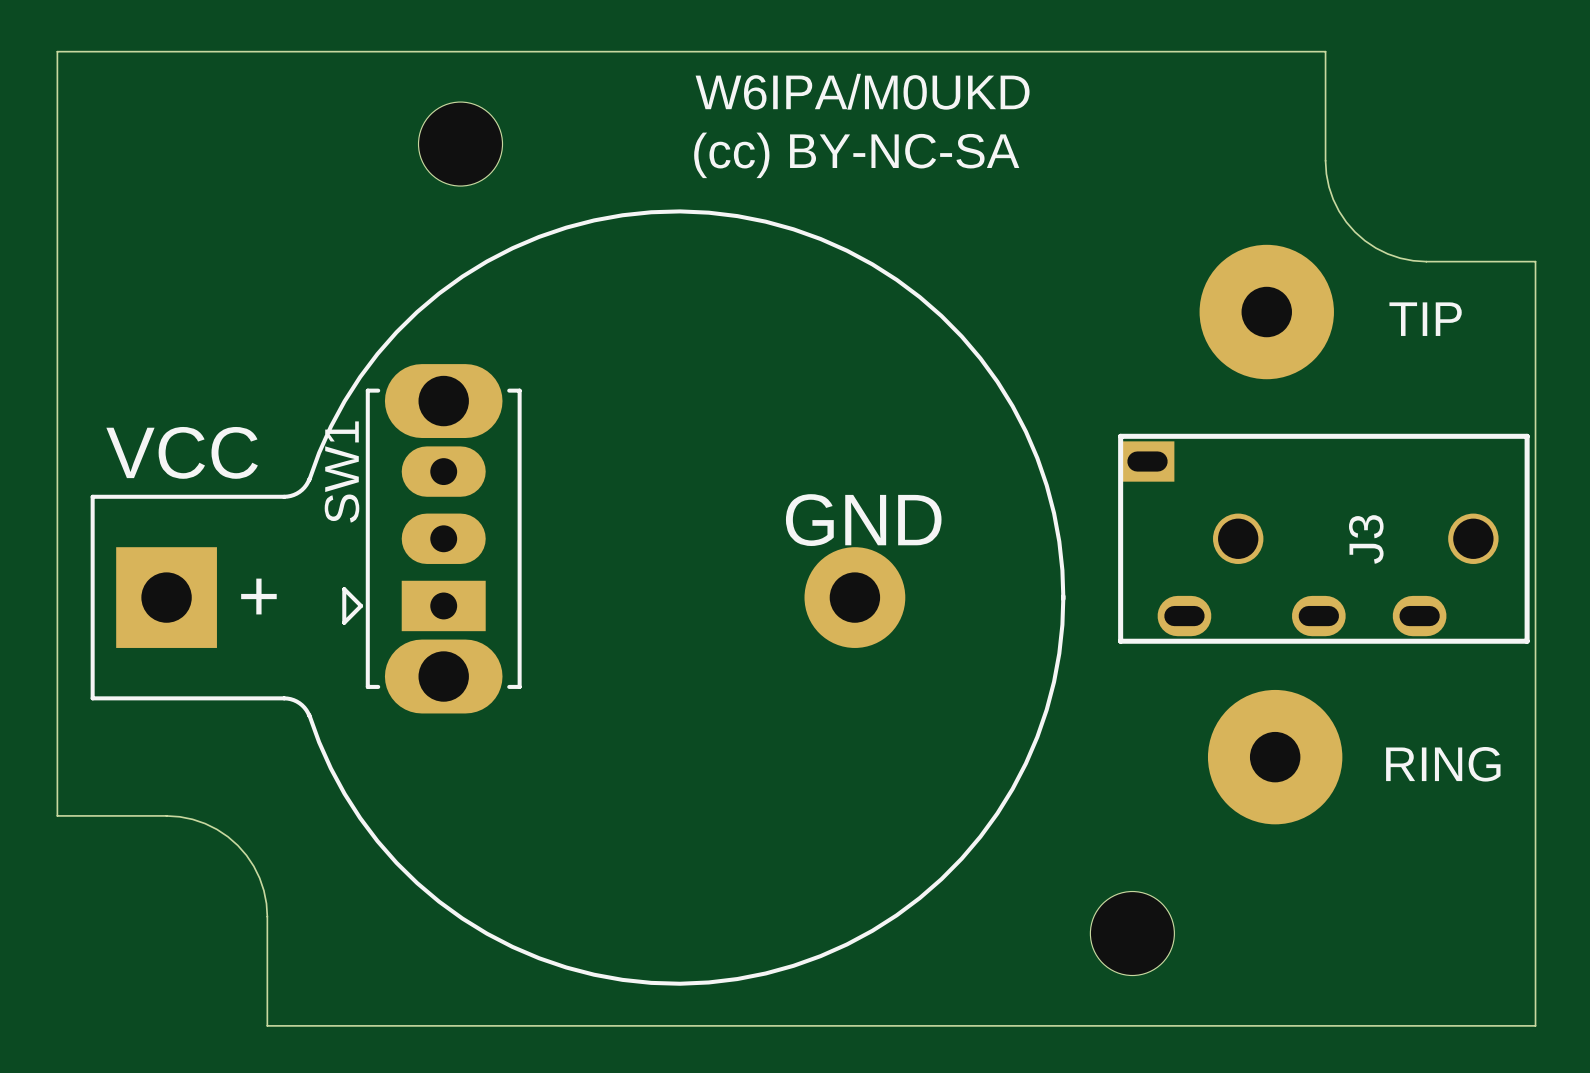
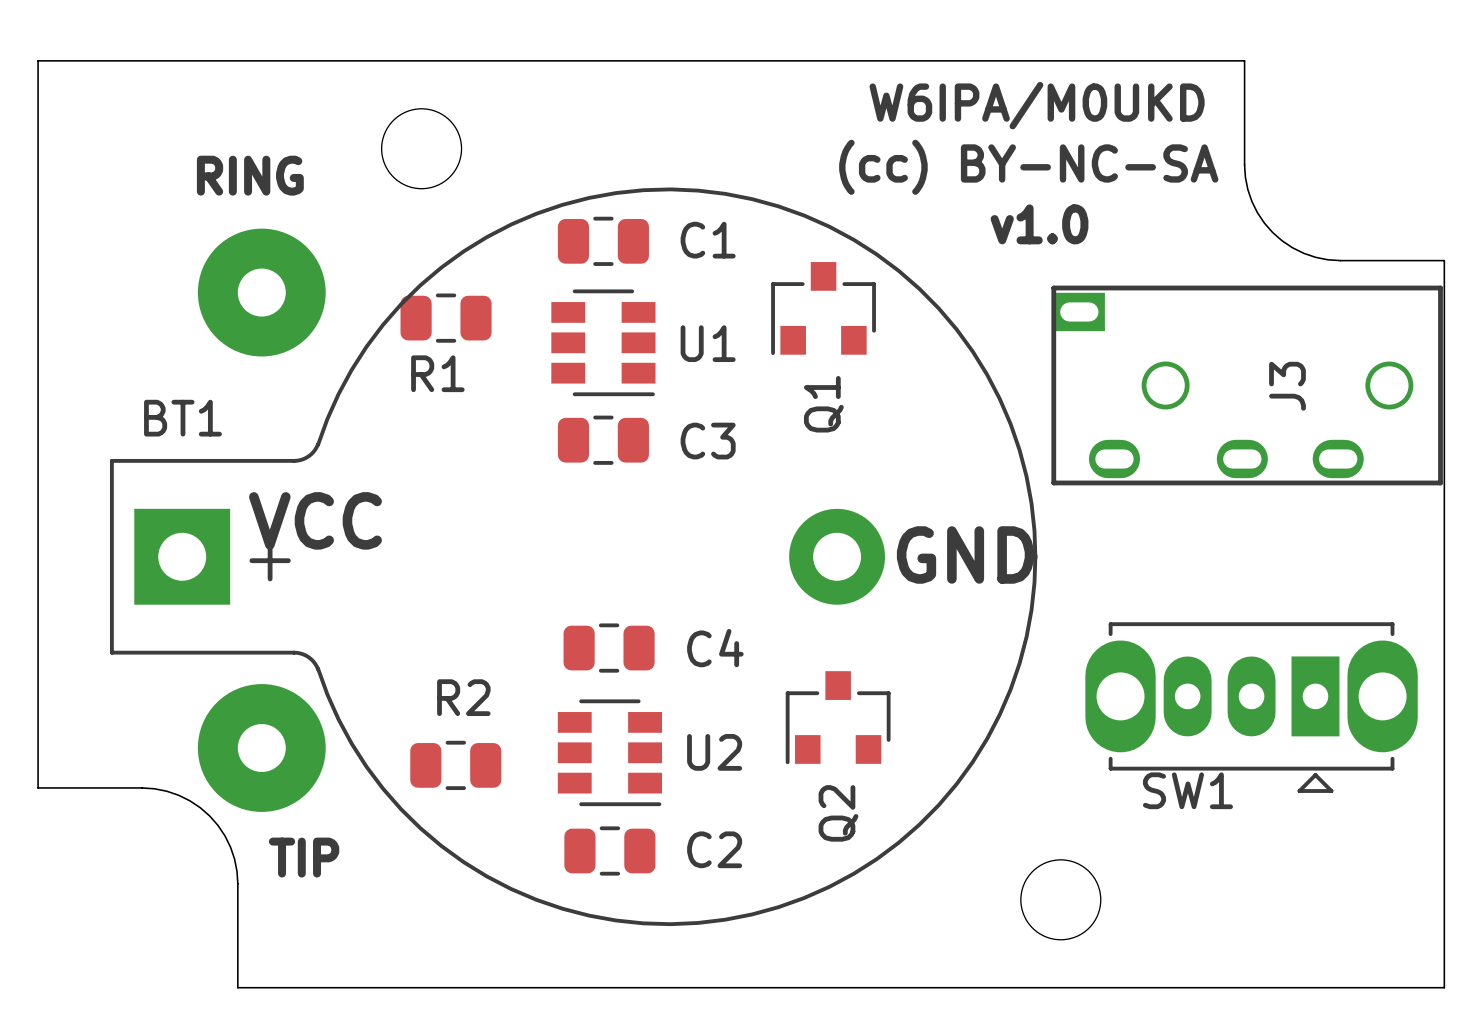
text position: W6IPA/M0UKD (862, 91) -> W6IPA/M0UKD (1037, 105)
text position: (cc) BY-NC-SA (856, 155) -> (cc) BY-NC-SA (1028, 167)
text: none -> RING (250, 175)
text: none -> v1.0 (1039, 224)
C1: none -> (603, 241)
part: none -> (261, 292)
Q1: none -> (823, 308)
part: (1266, 312) -> none
text: TIP (1425, 319) -> none
R1: none -> (446, 318)
U1: none -> (603, 342)
C3: none -> (603, 440)
text position: VCC (182, 452) -> VCC (315, 520)
text position: GND (863, 520) -> GND (965, 554)
SW1 rotation: 0° (431, 538) -> 90° counterclockwise (1251, 707)
SW1 position: (431, 538) -> (1251, 707)
J3 position: (1323, 538) -> (1247, 385)
BT1: none -> (573, 556)
part: (578, 597) -> none
C4: none -> (609, 648)
Q2: none -> (838, 717)
part: (1275, 757) -> none
text: RING (1443, 764) -> none
part: none -> (261, 748)
U2: none -> (609, 752)
R2: none -> (455, 765)
C2: none -> (609, 850)
text: none -> TIP (304, 857)

